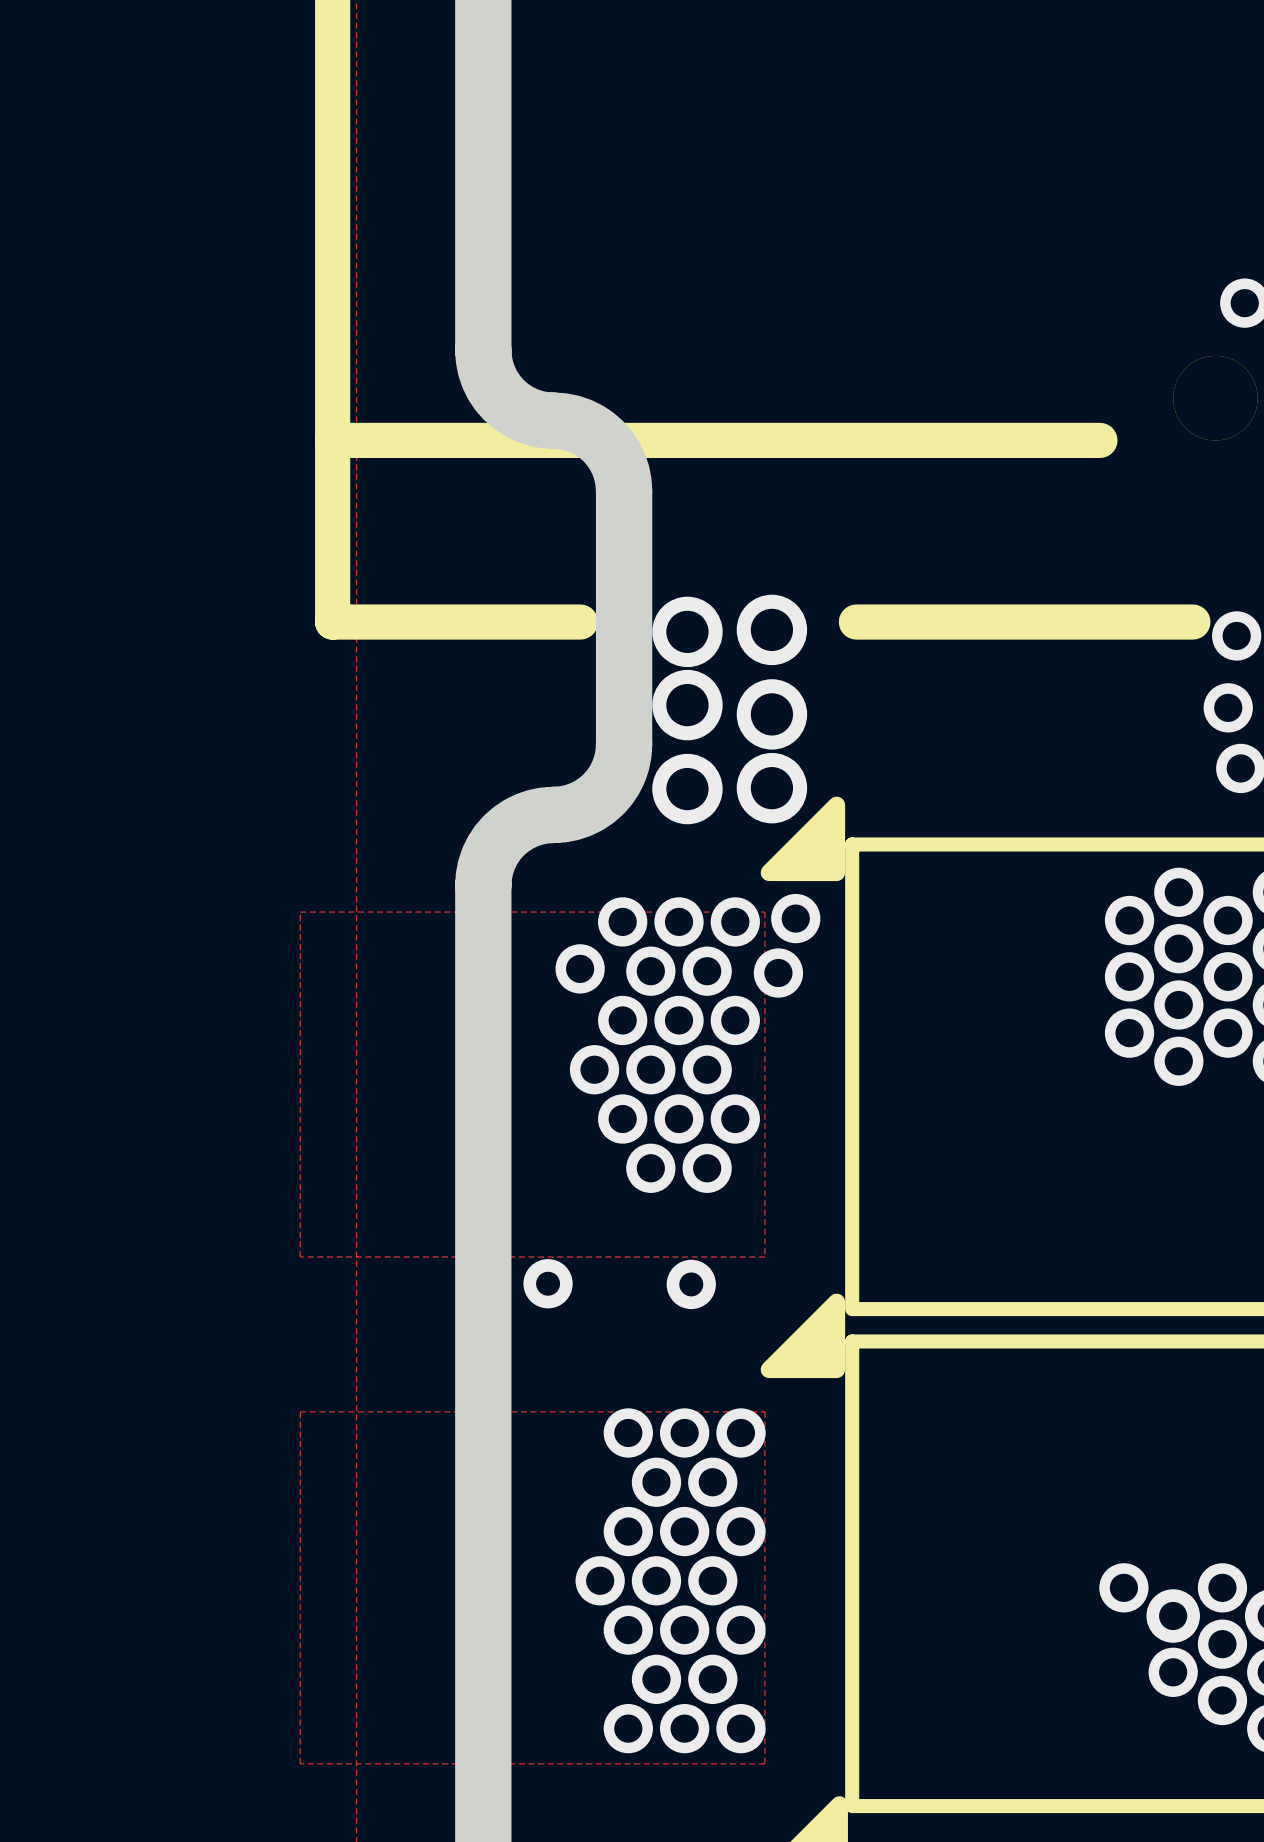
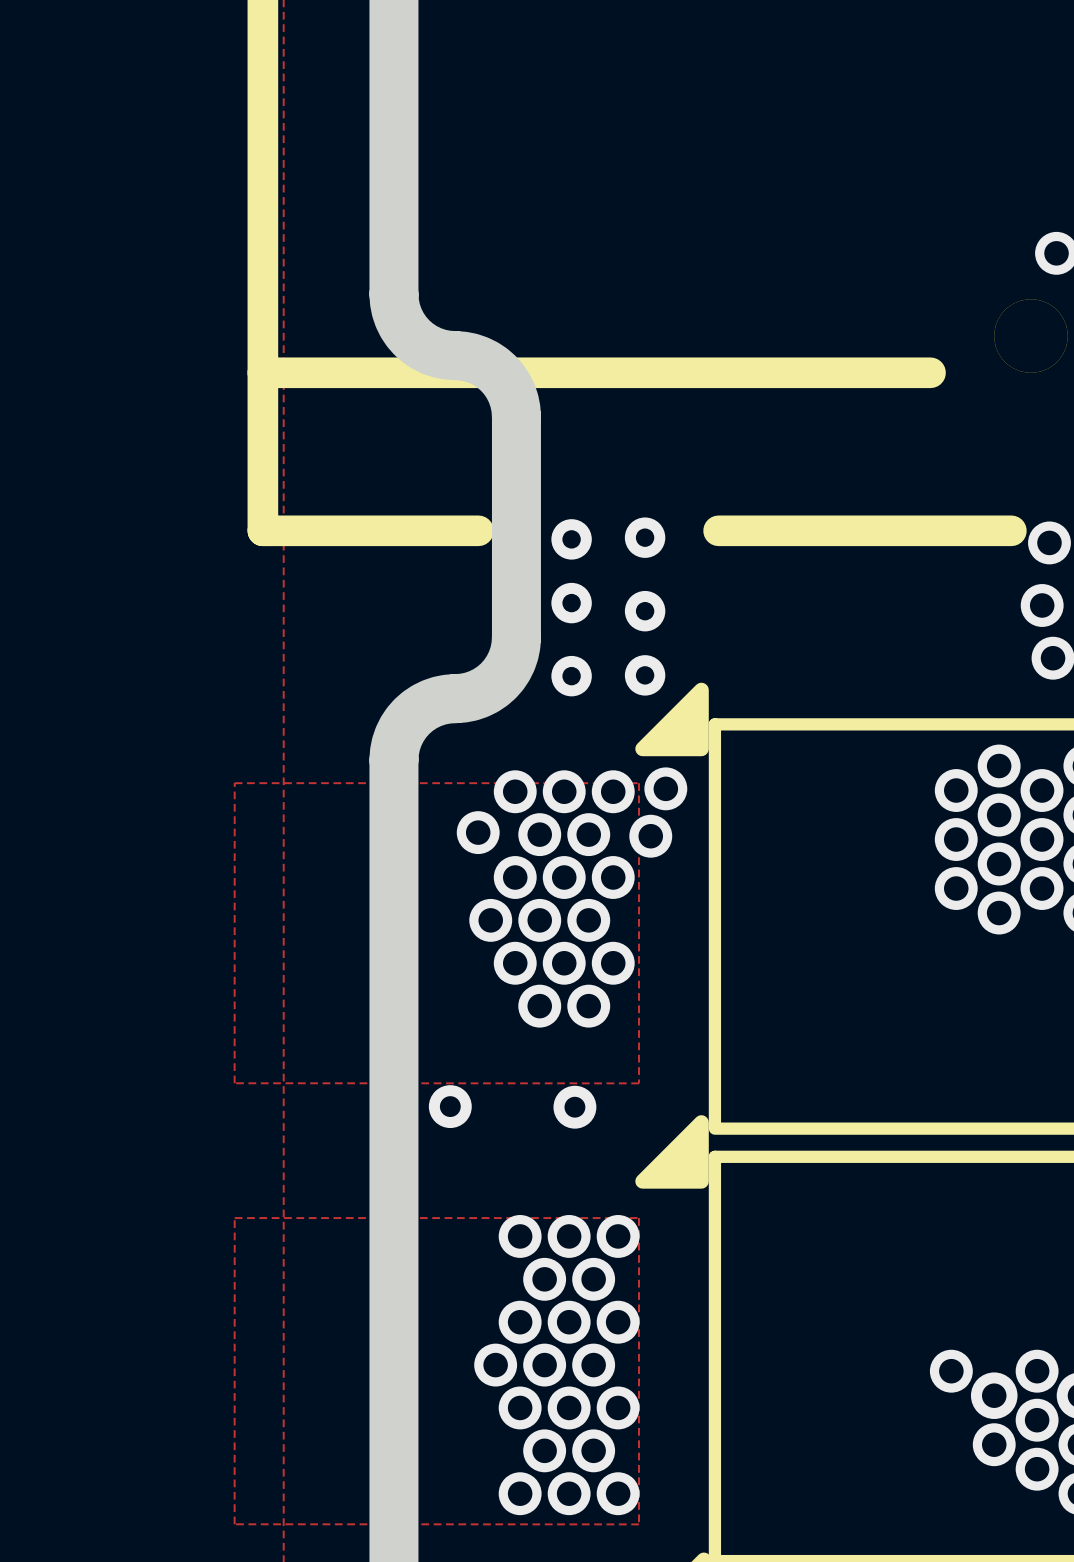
via size: [736, 594, 808, 666] -> [624, 517, 666, 558]
via size: [652, 596, 723, 668] -> [551, 519, 592, 560]
via size: [652, 669, 723, 741] -> [551, 582, 592, 624]
via size: [736, 679, 808, 750] -> [624, 590, 666, 632]
via size: [736, 752, 808, 824] -> [624, 655, 666, 696]
via size: [652, 753, 723, 825] -> [551, 655, 592, 697]

